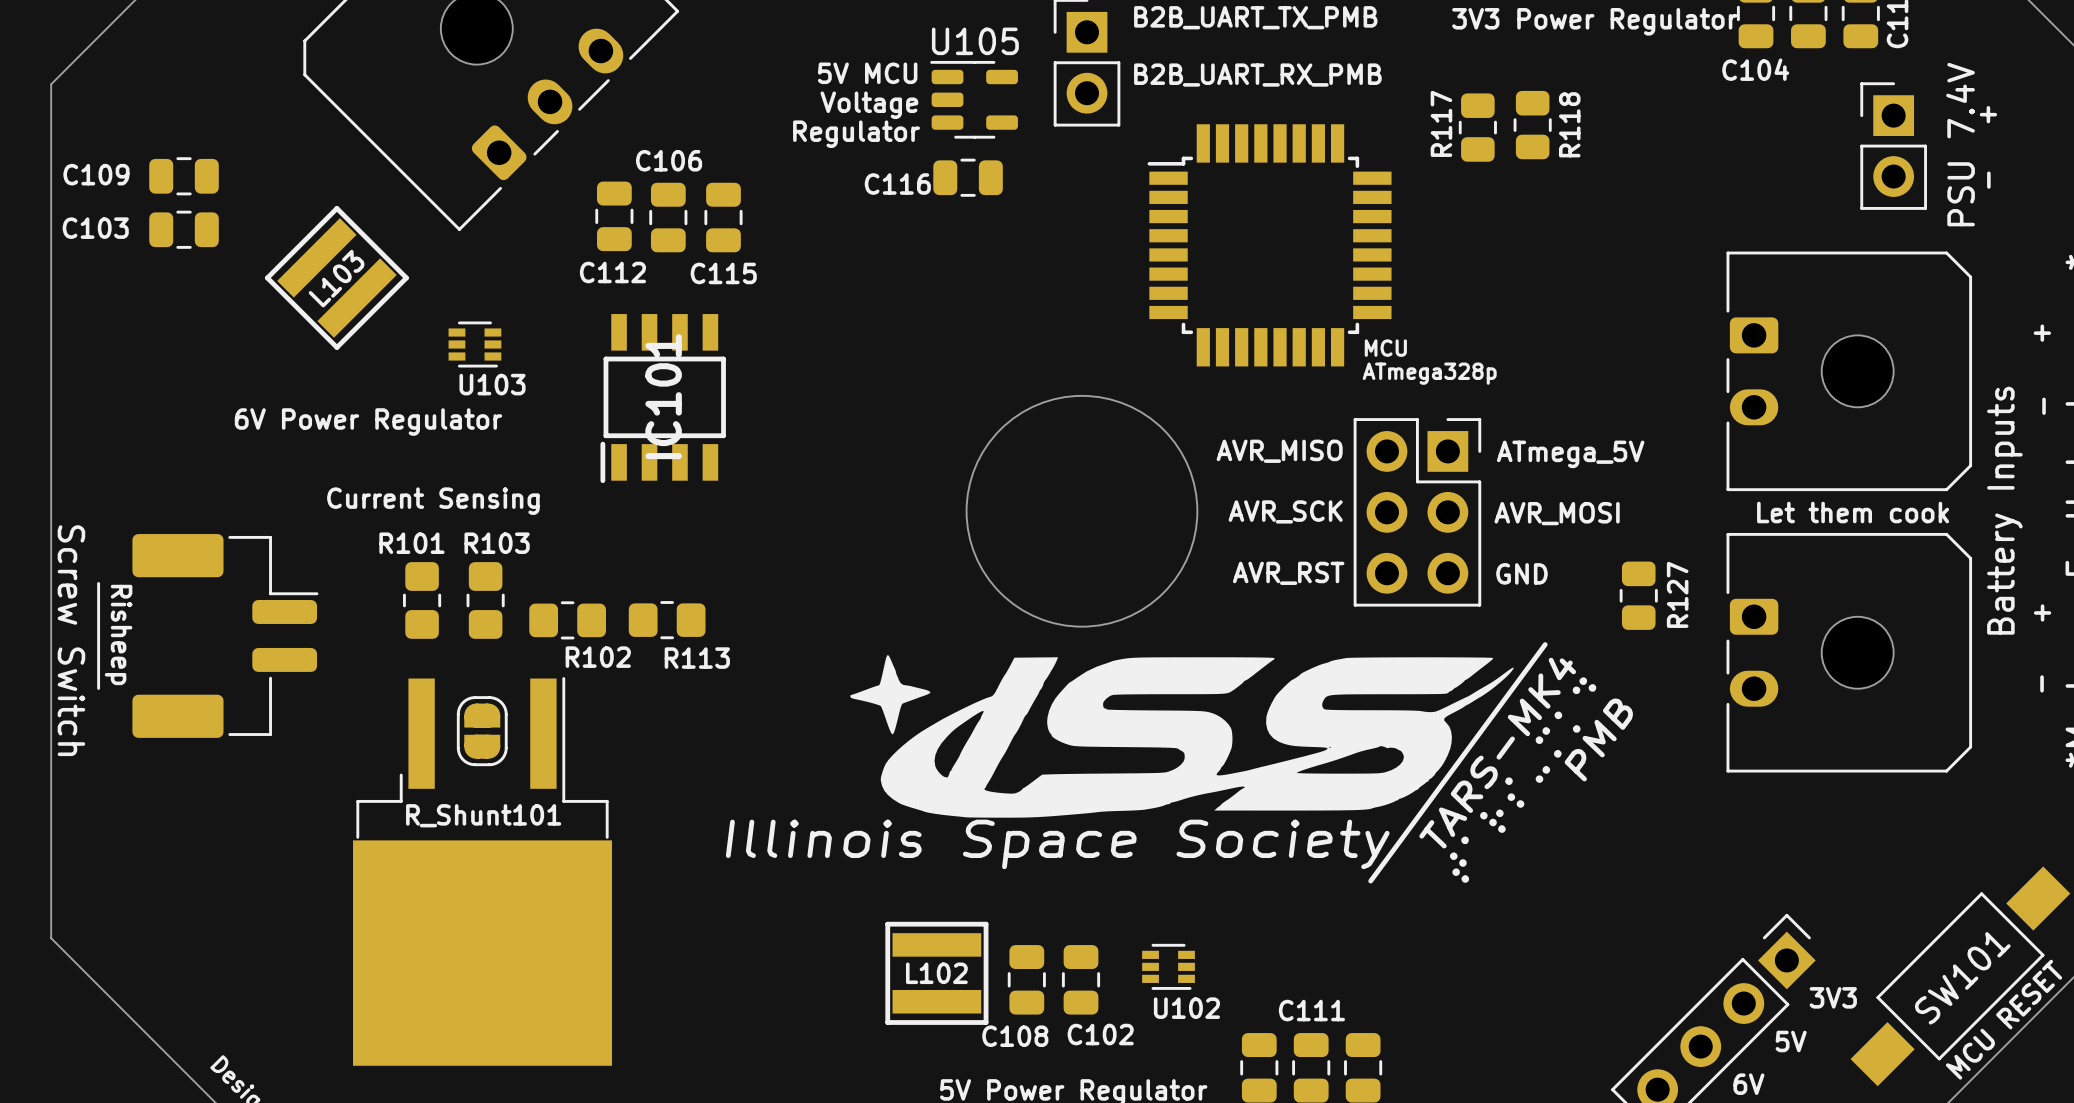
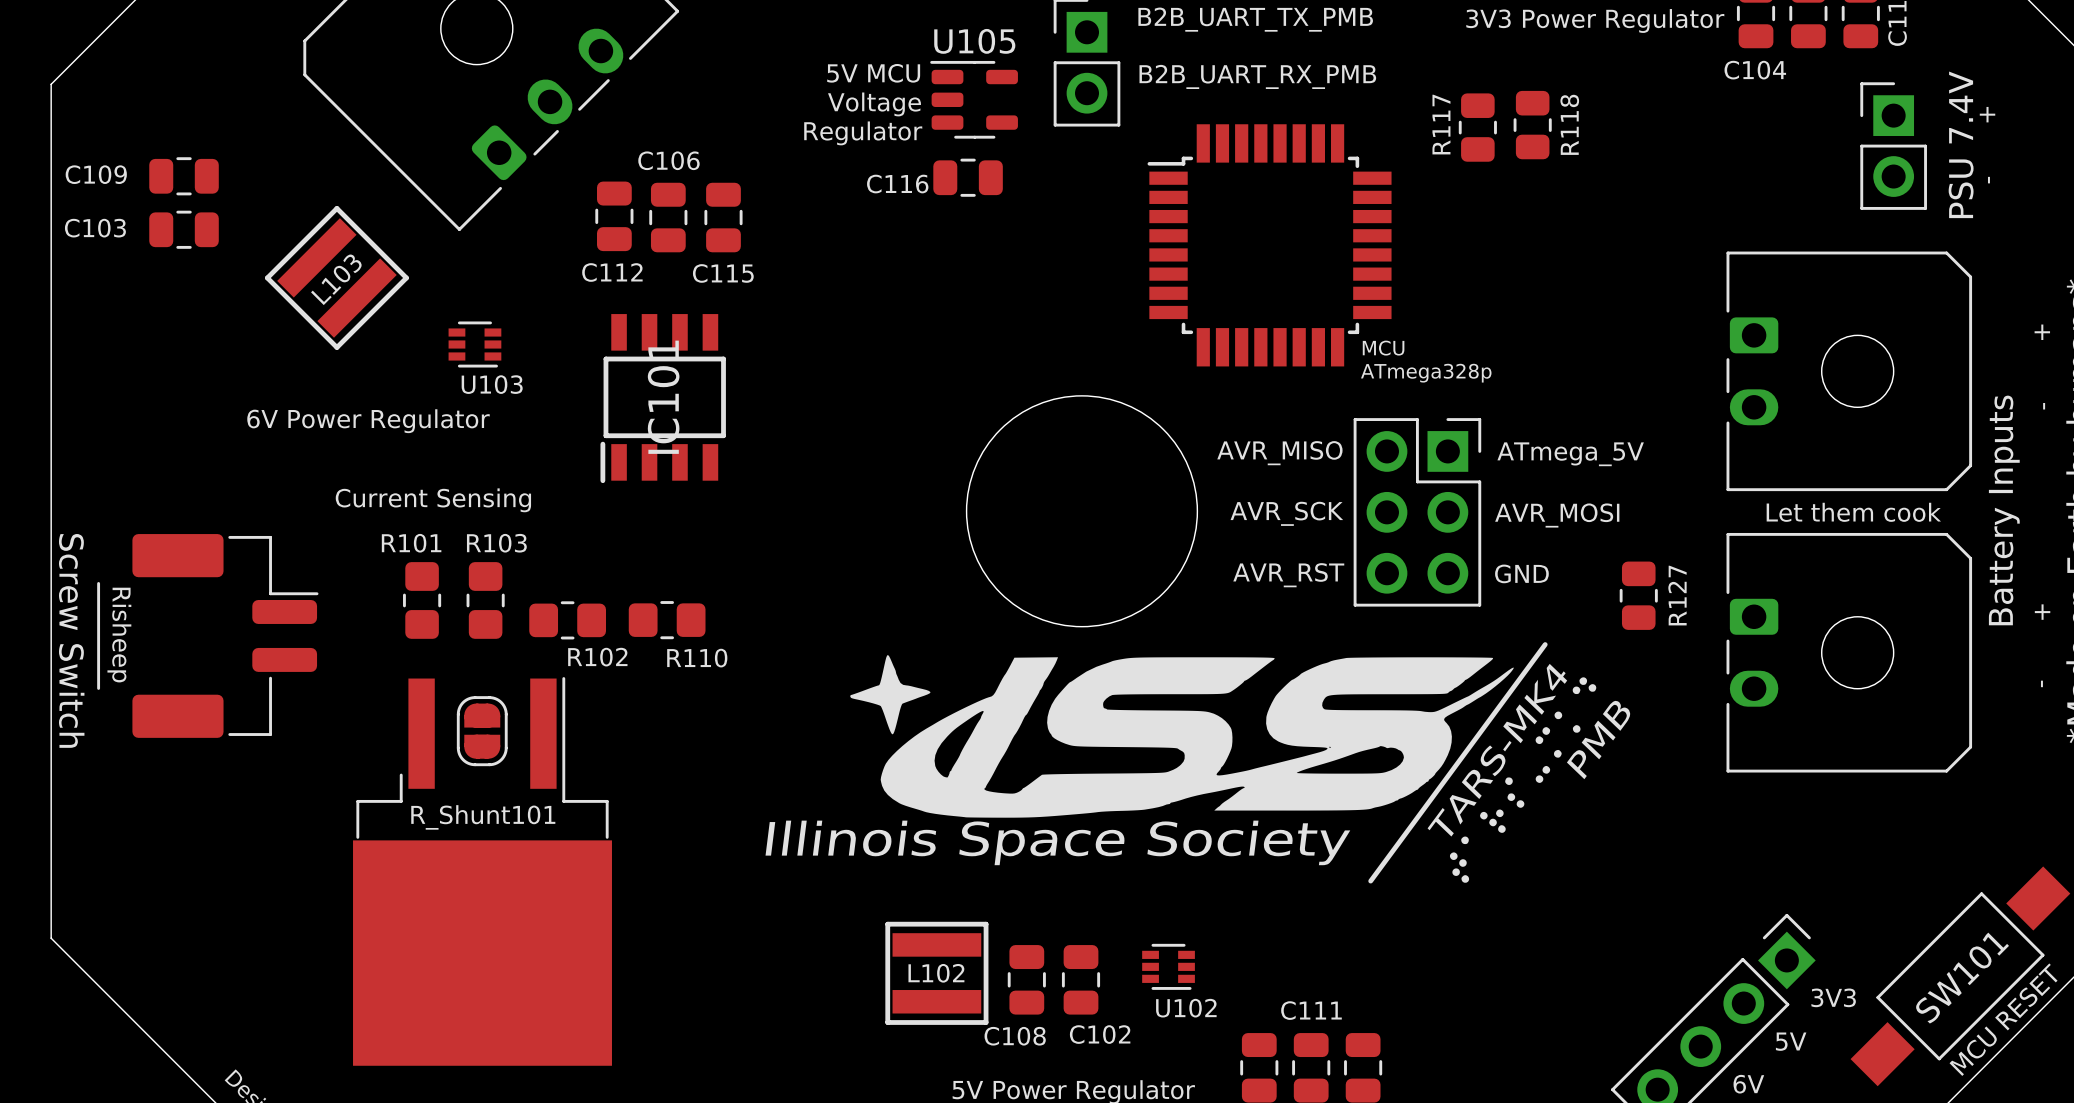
R113 name: R113 (697, 658) -> R110 (697, 658)

